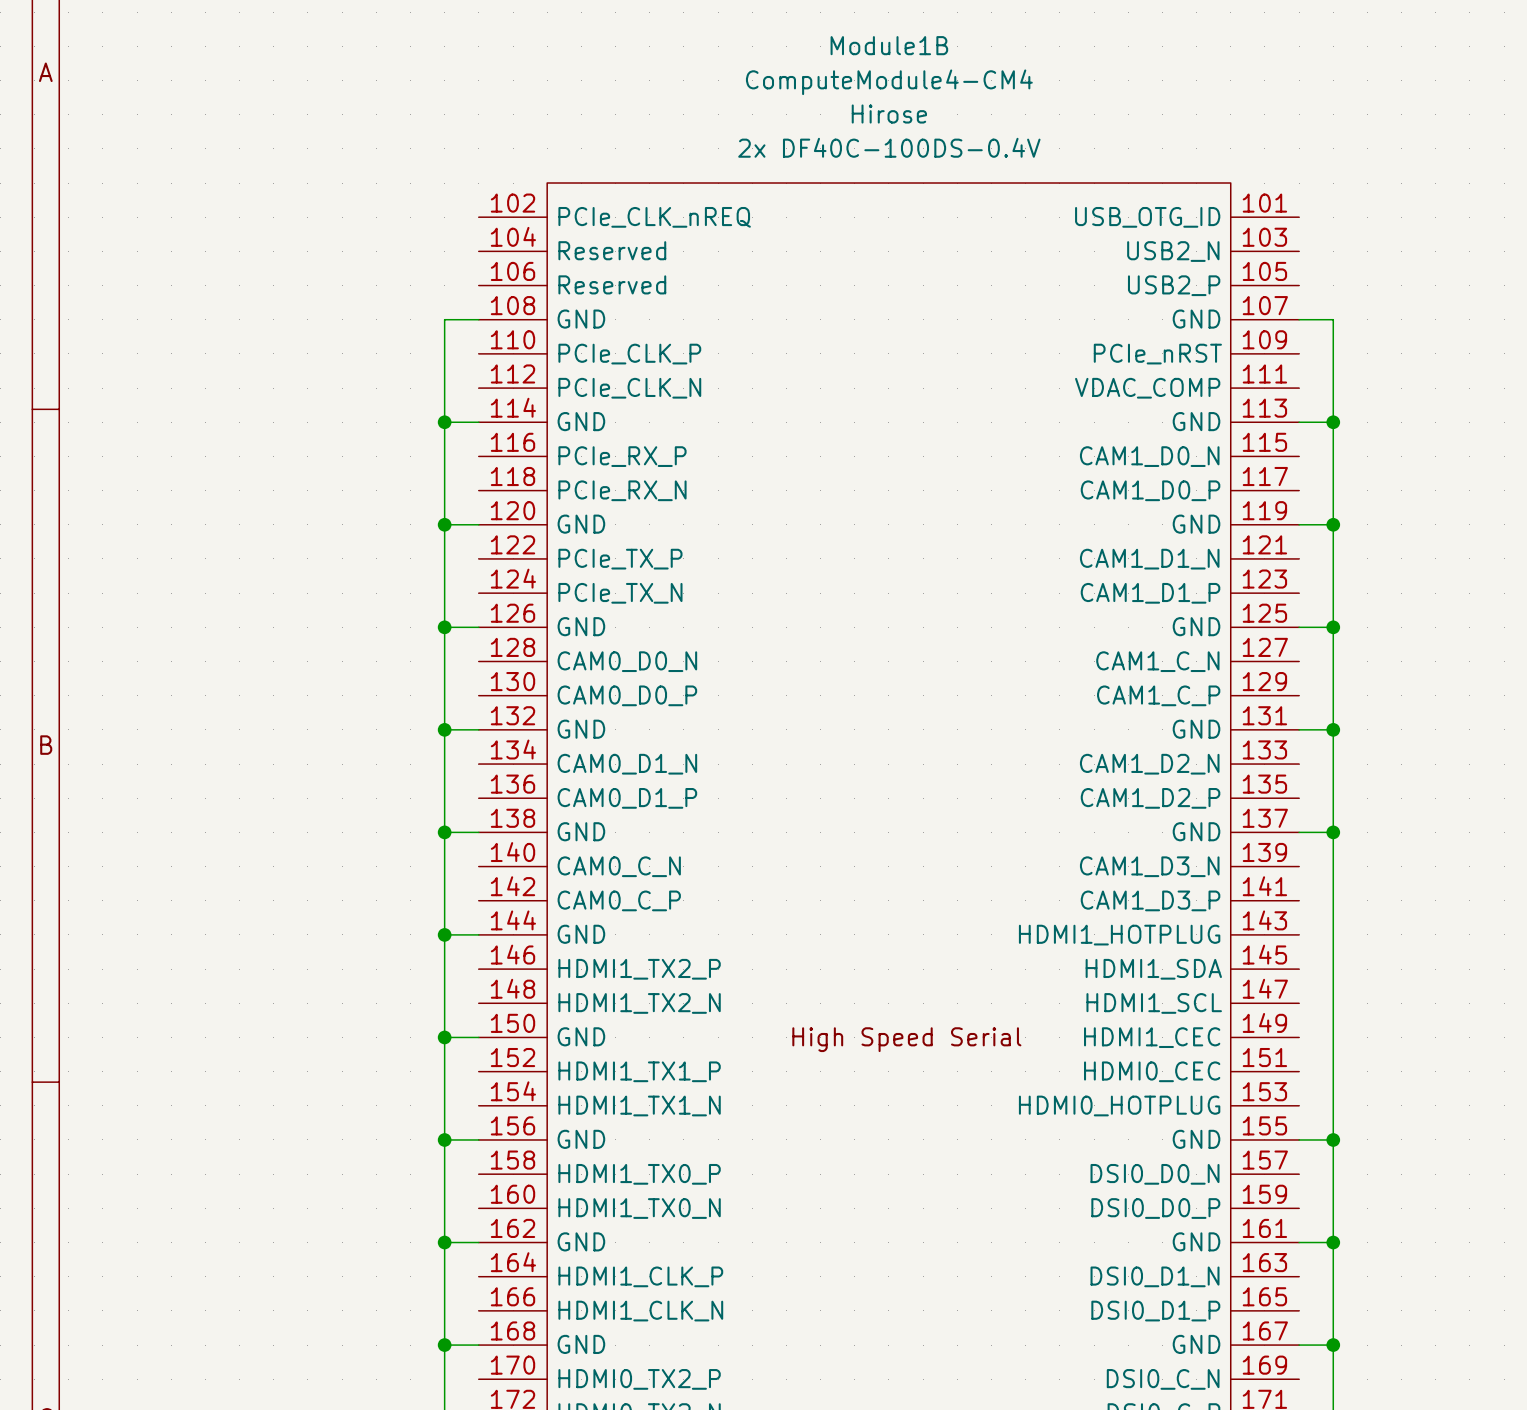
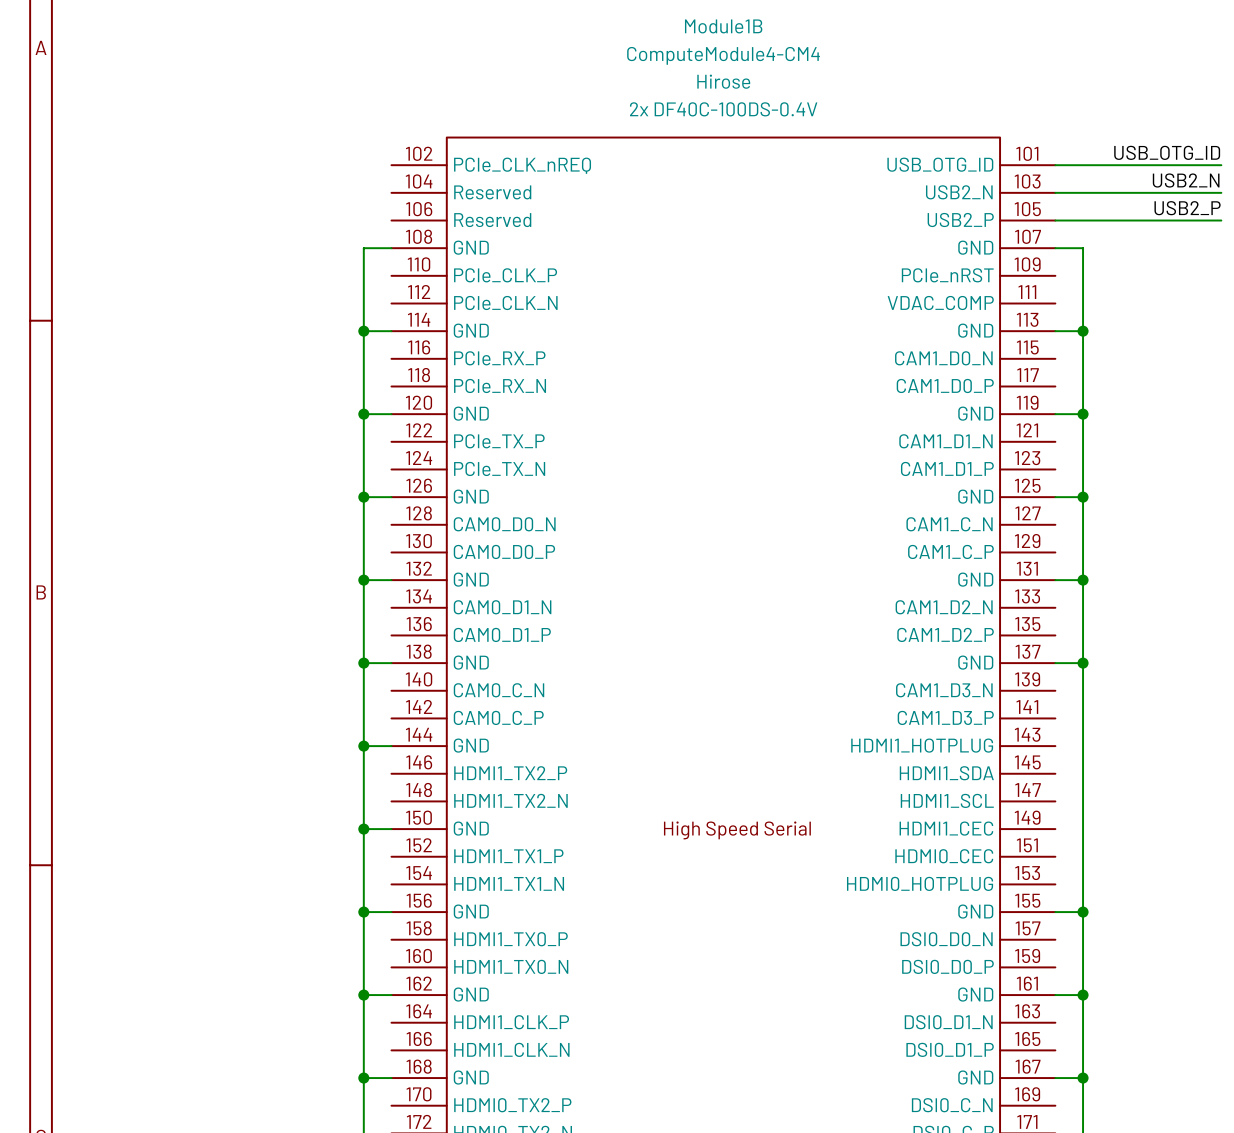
label: none -> USB_OTG_ID (1167, 152)
wire: none -> (1055, 165) (1221, 165)
label: none -> USB2_N (1186, 180)
wire: none -> (1055, 192) (1221, 192)
label: none -> USB2_P (1187, 208)
wire: none -> (1055, 220) (1221, 220)

